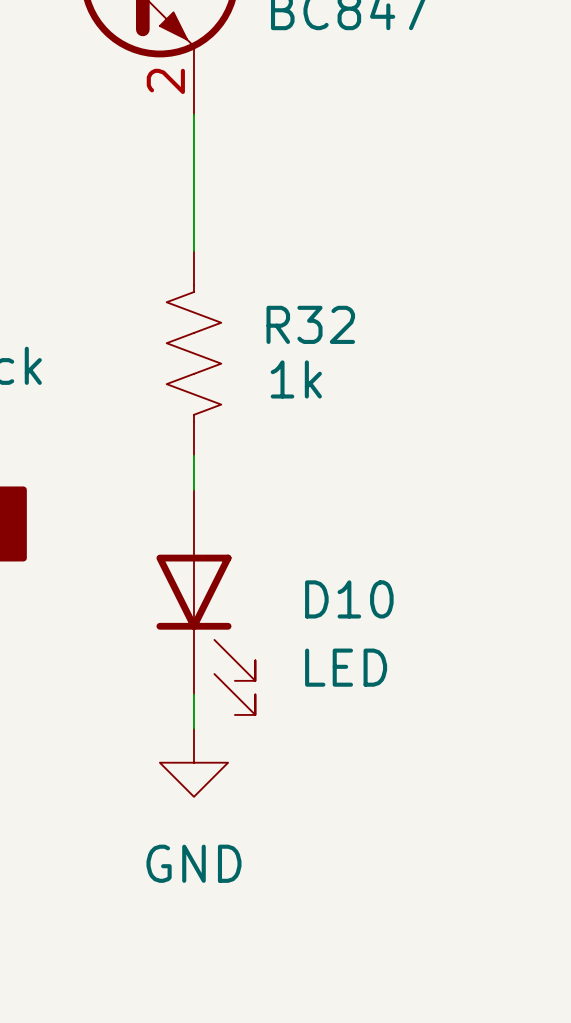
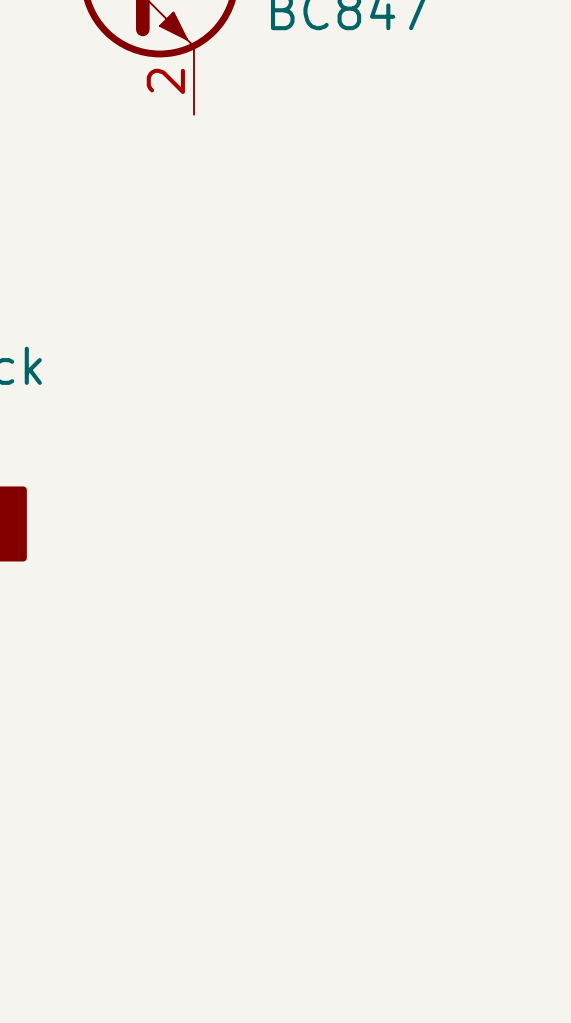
wire: (193, 114) (193, 251) -> none
R32: 1k (193, 353) -> none
wire: (193, 455) (193, 489) -> none
D10: LED (205, 602) -> none
wire: (193, 694) (193, 728) -> none
power symbol: GND (193, 762) -> none

